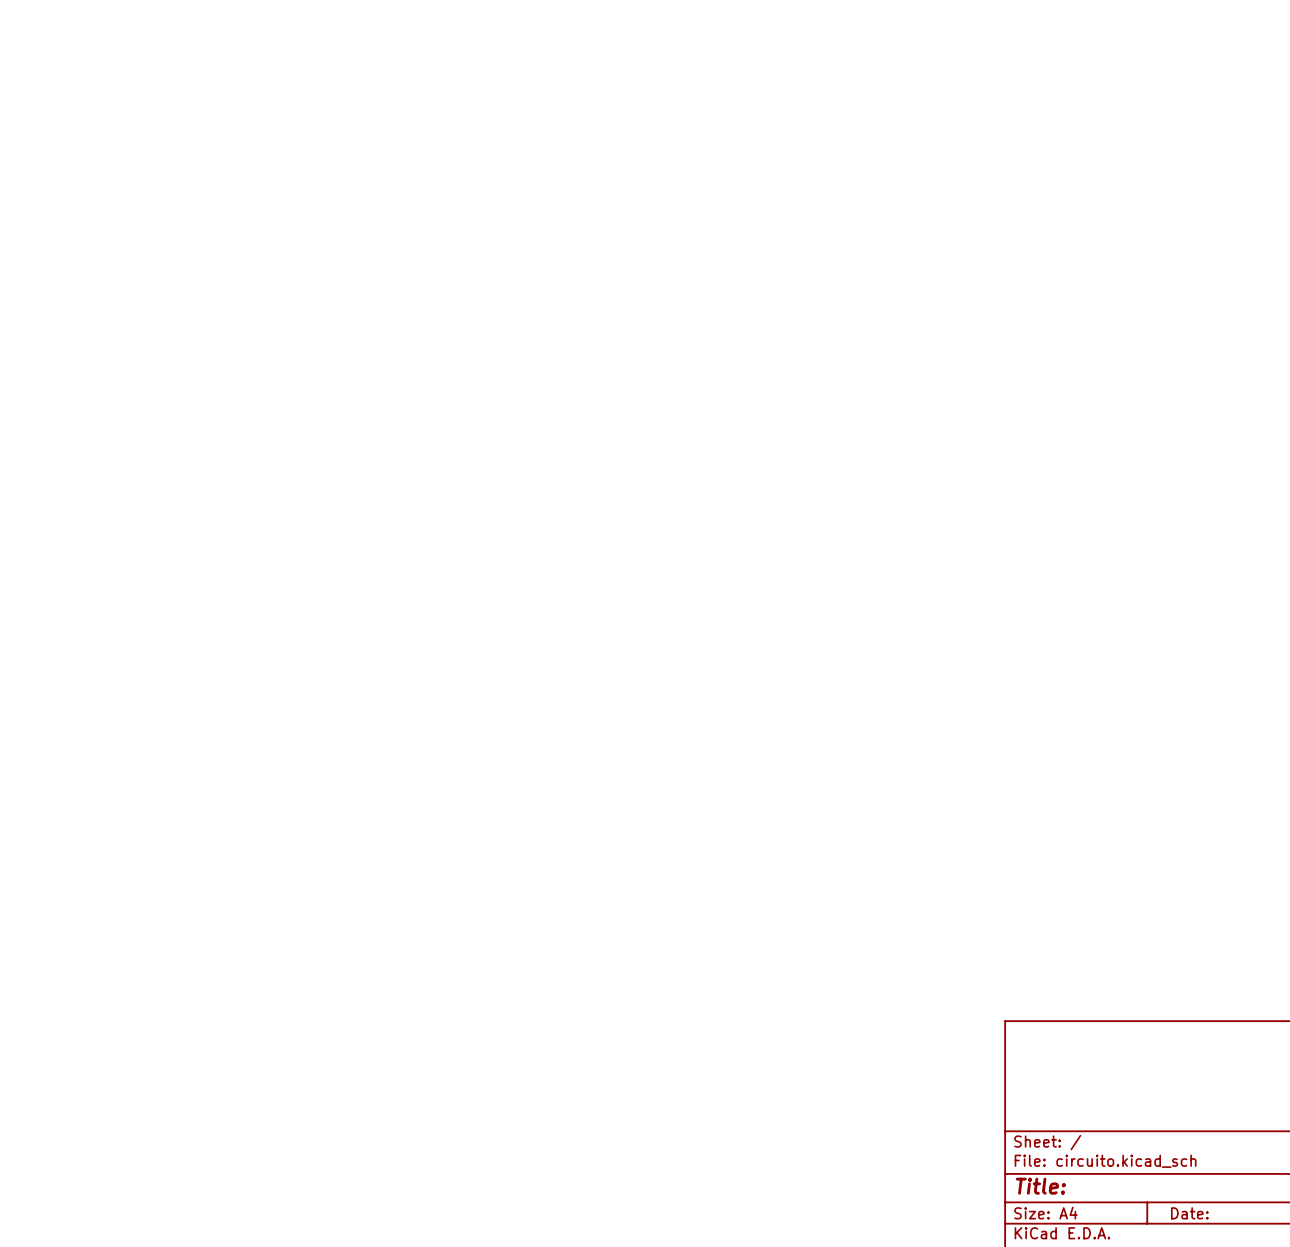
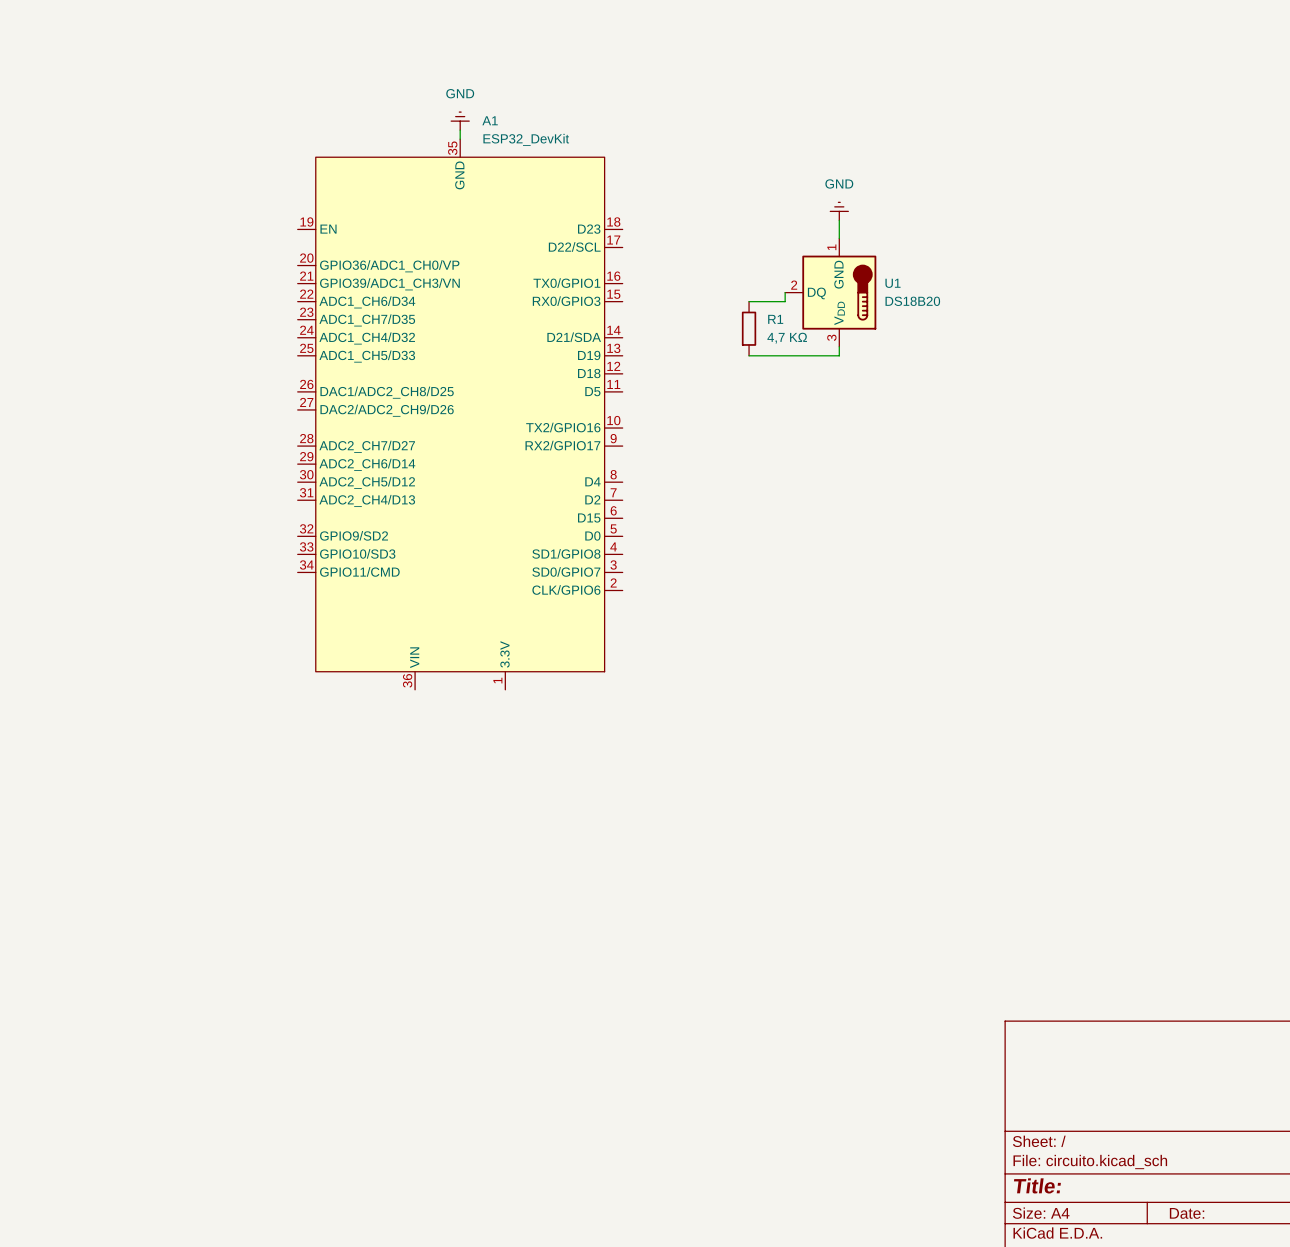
power symbol: none -> GND (460, 121)
wire: none -> (460, 130) (460, 139)
power symbol: none -> GND (839, 211)
wire: none -> (839, 220) (839, 238)
wire: none -> (785, 292) (785, 301) (749, 301)
U1: none -> DS18B20 (830, 292)
R1: none -> 4,7 KΩ (749, 328)
wire: none -> (839, 346) (839, 355) (749, 355)
A1: none -> ESP32_DevKit (460, 414)

